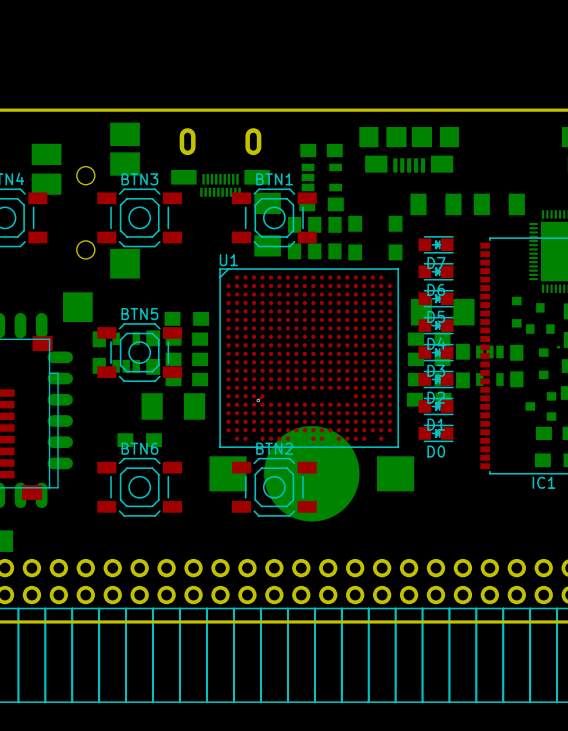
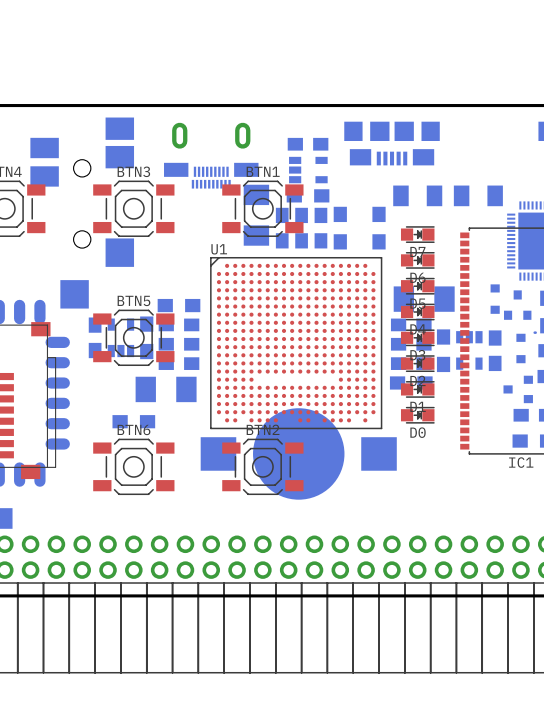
top track: (262, 396) (258, 400) -> none
via: (258, 400) -> none

